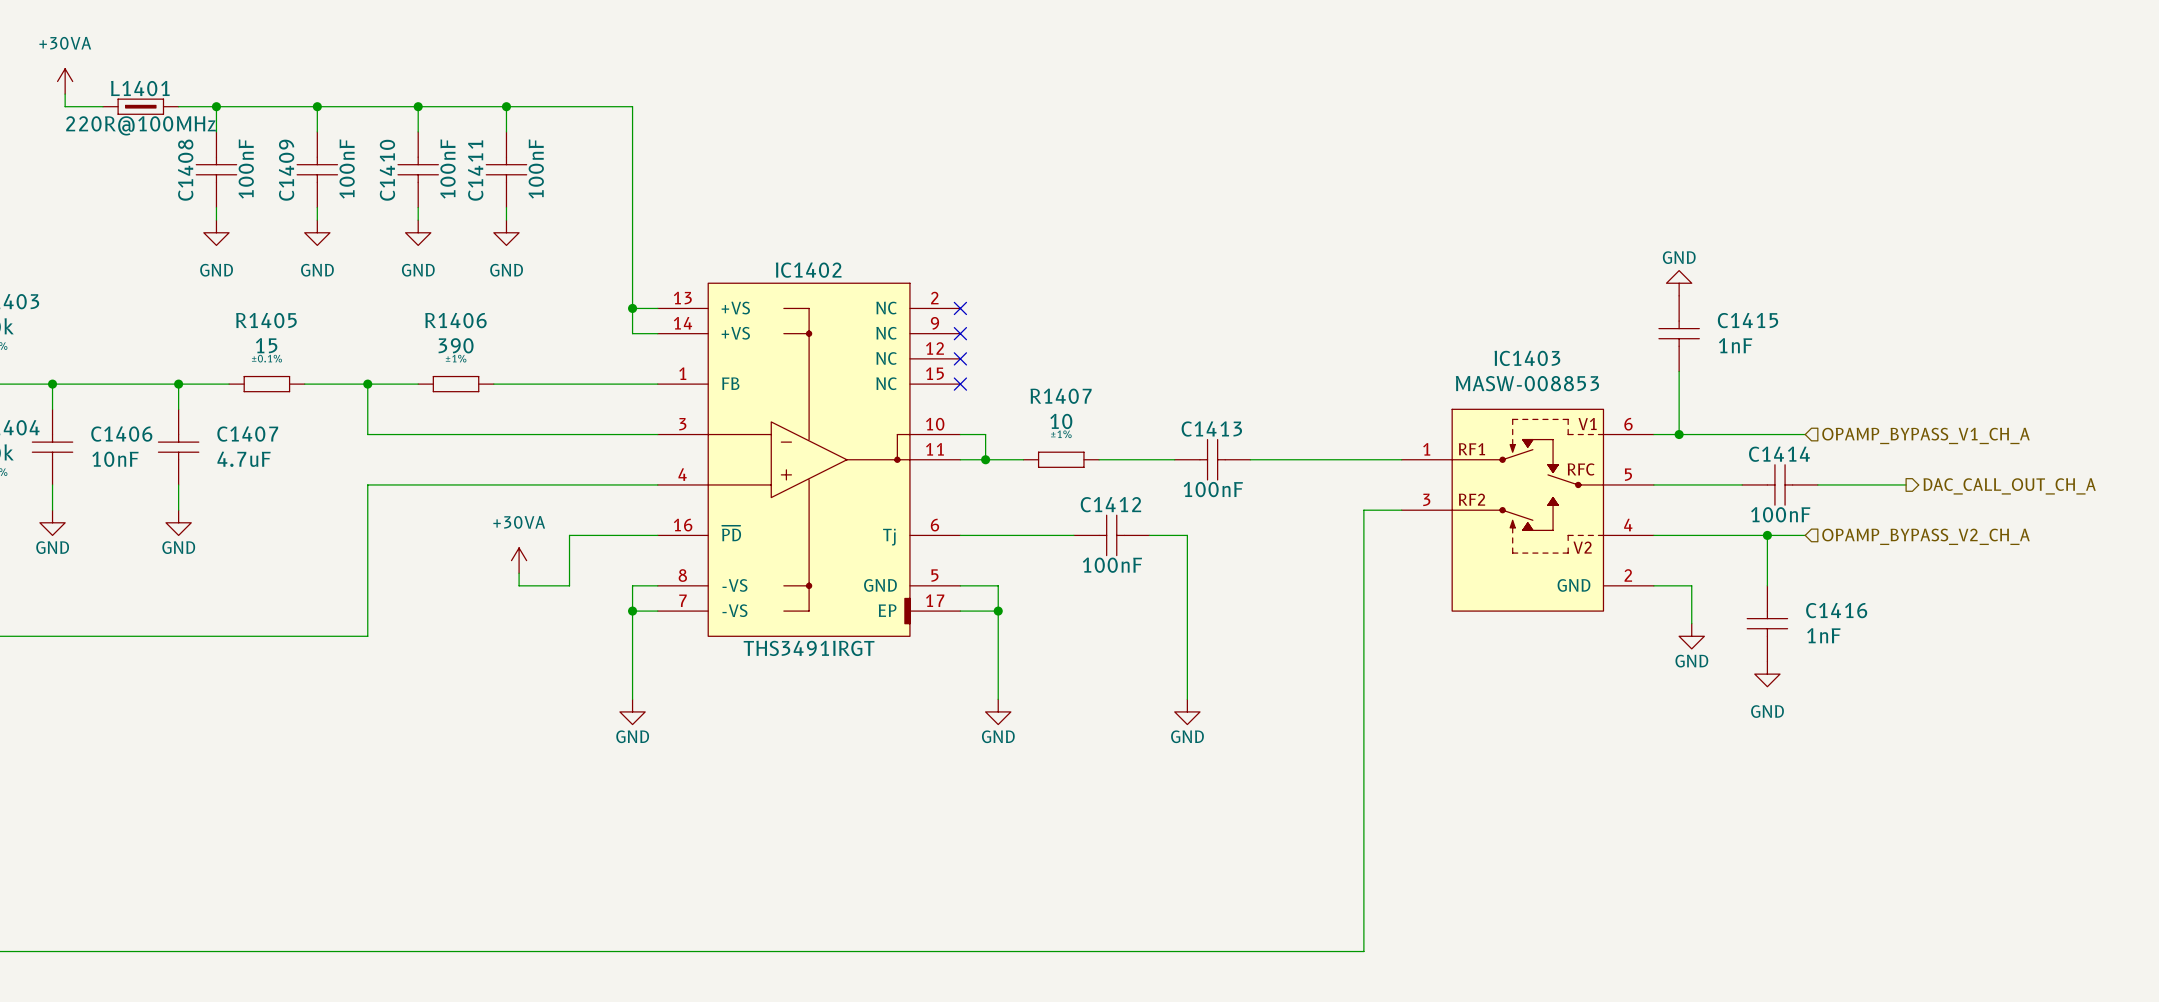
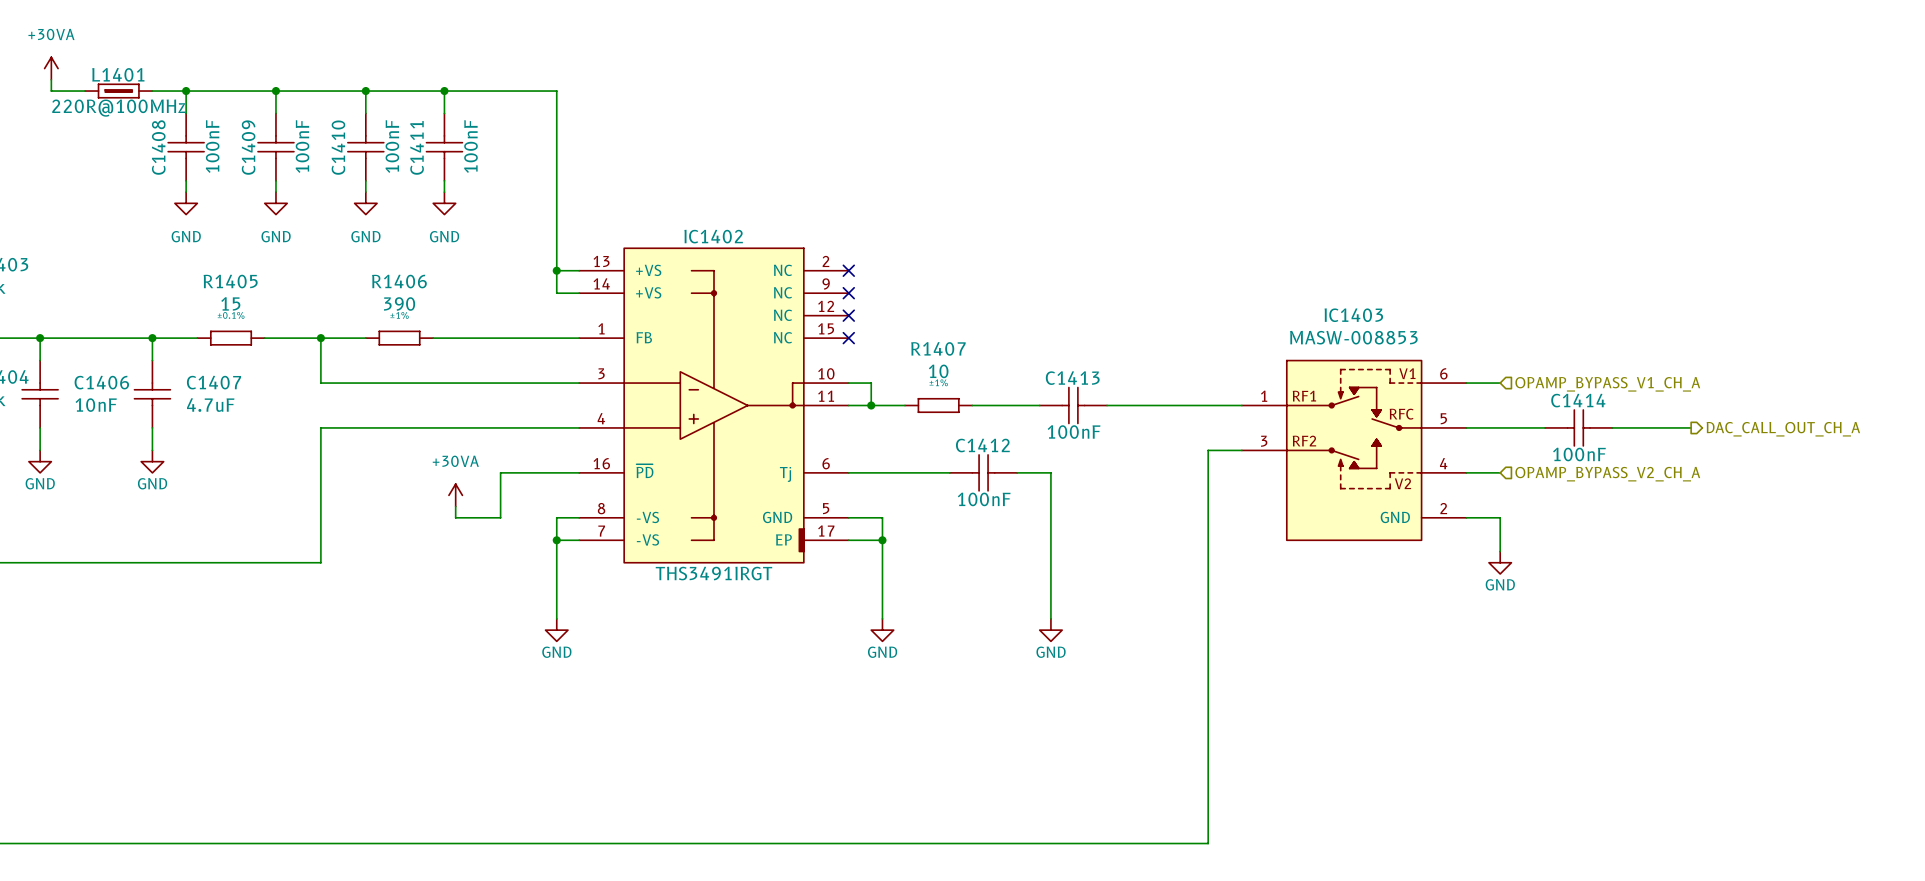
power symbol: GND (1679, 283) -> none
C1415: 1nF (1679, 333) -> none
wire: (1679, 371) (1679, 434) -> none
junction: (1679, 434) -> none
wire: (1691, 434) (1805, 434) -> none
hierarchical label position: OPAMP_BYPASS_V1_CH_A (1926, 435) -> OPAMP_BYPASS_V1_CH_A (1607, 384)
wire: (1691, 535) (1805, 535) -> none
wire: (1767, 535) (1767, 585) -> none
junction: (1767, 535) -> none
hierarchical label position: OPAMP_BYPASS_V2_CH_A (1926, 536) -> OPAMP_BYPASS_V2_CH_A (1607, 474)
C1416: 1nF (1767, 623) -> none
power symbol: GND (1767, 674) -> none

